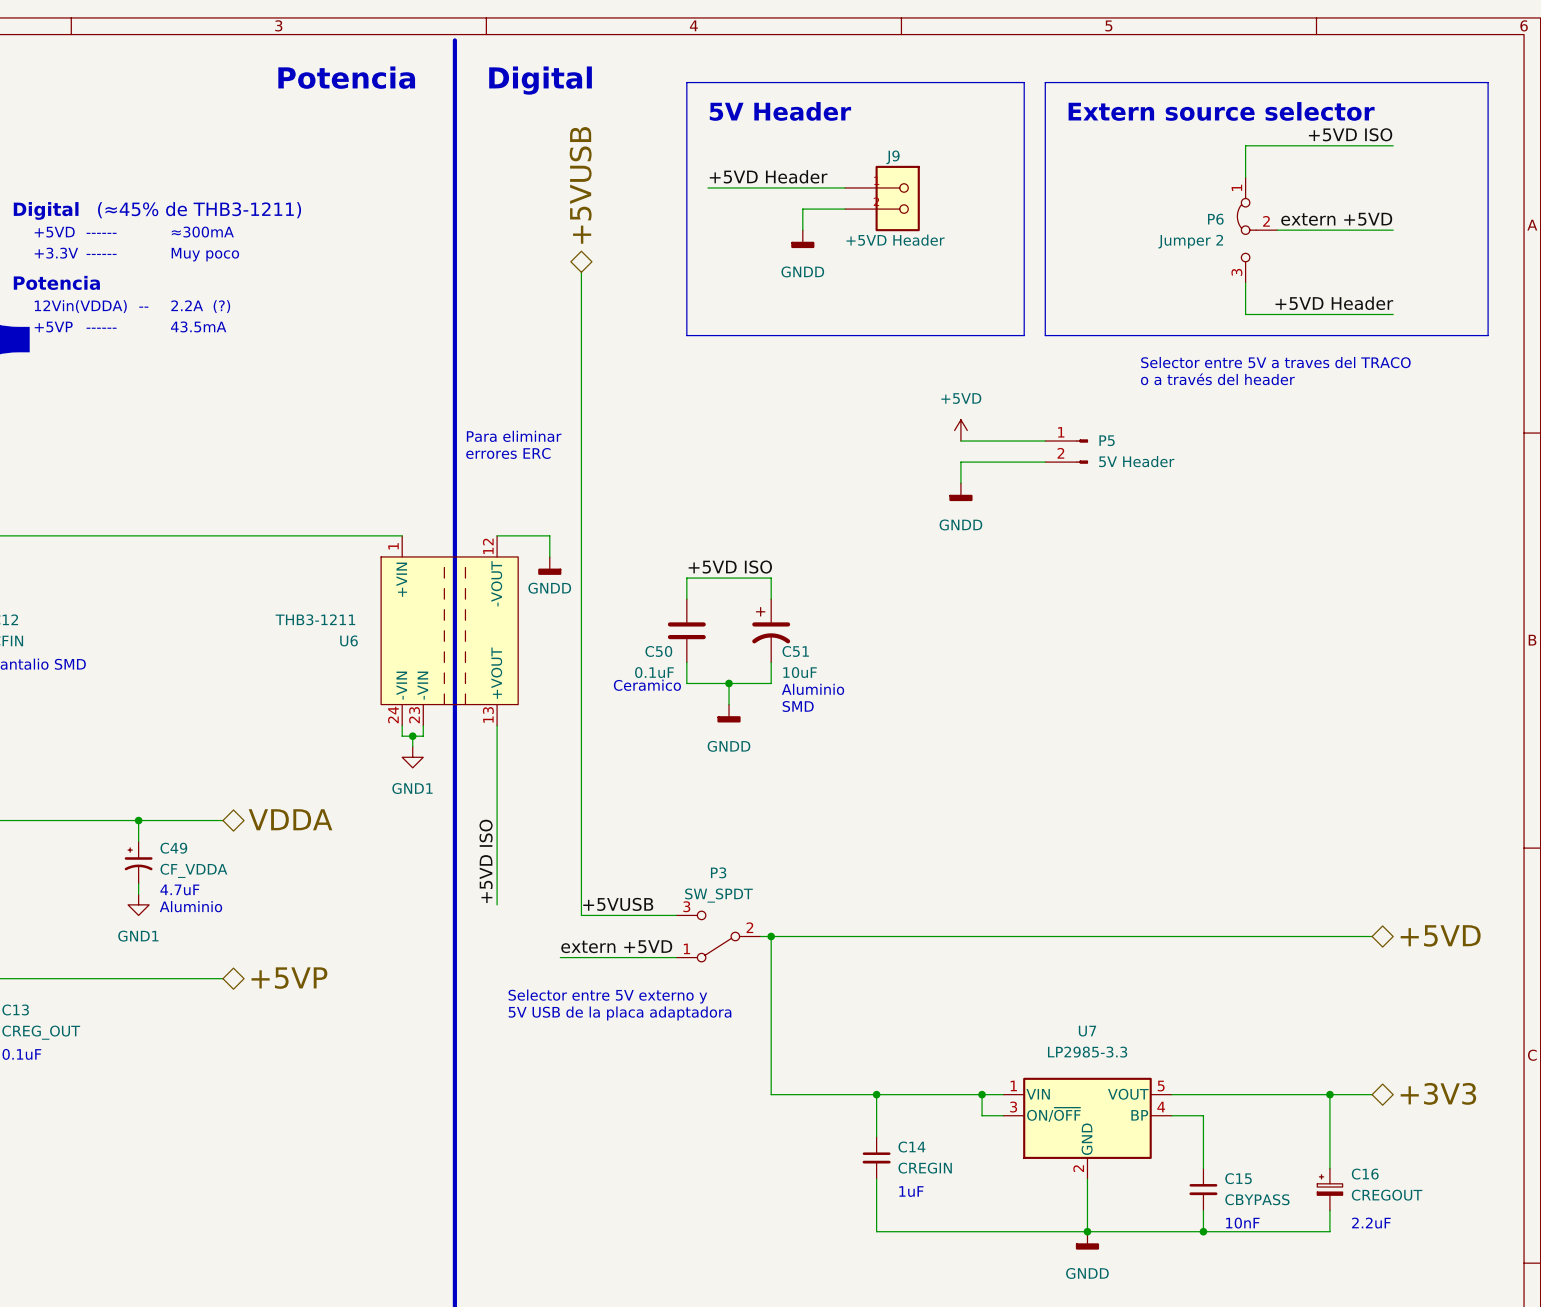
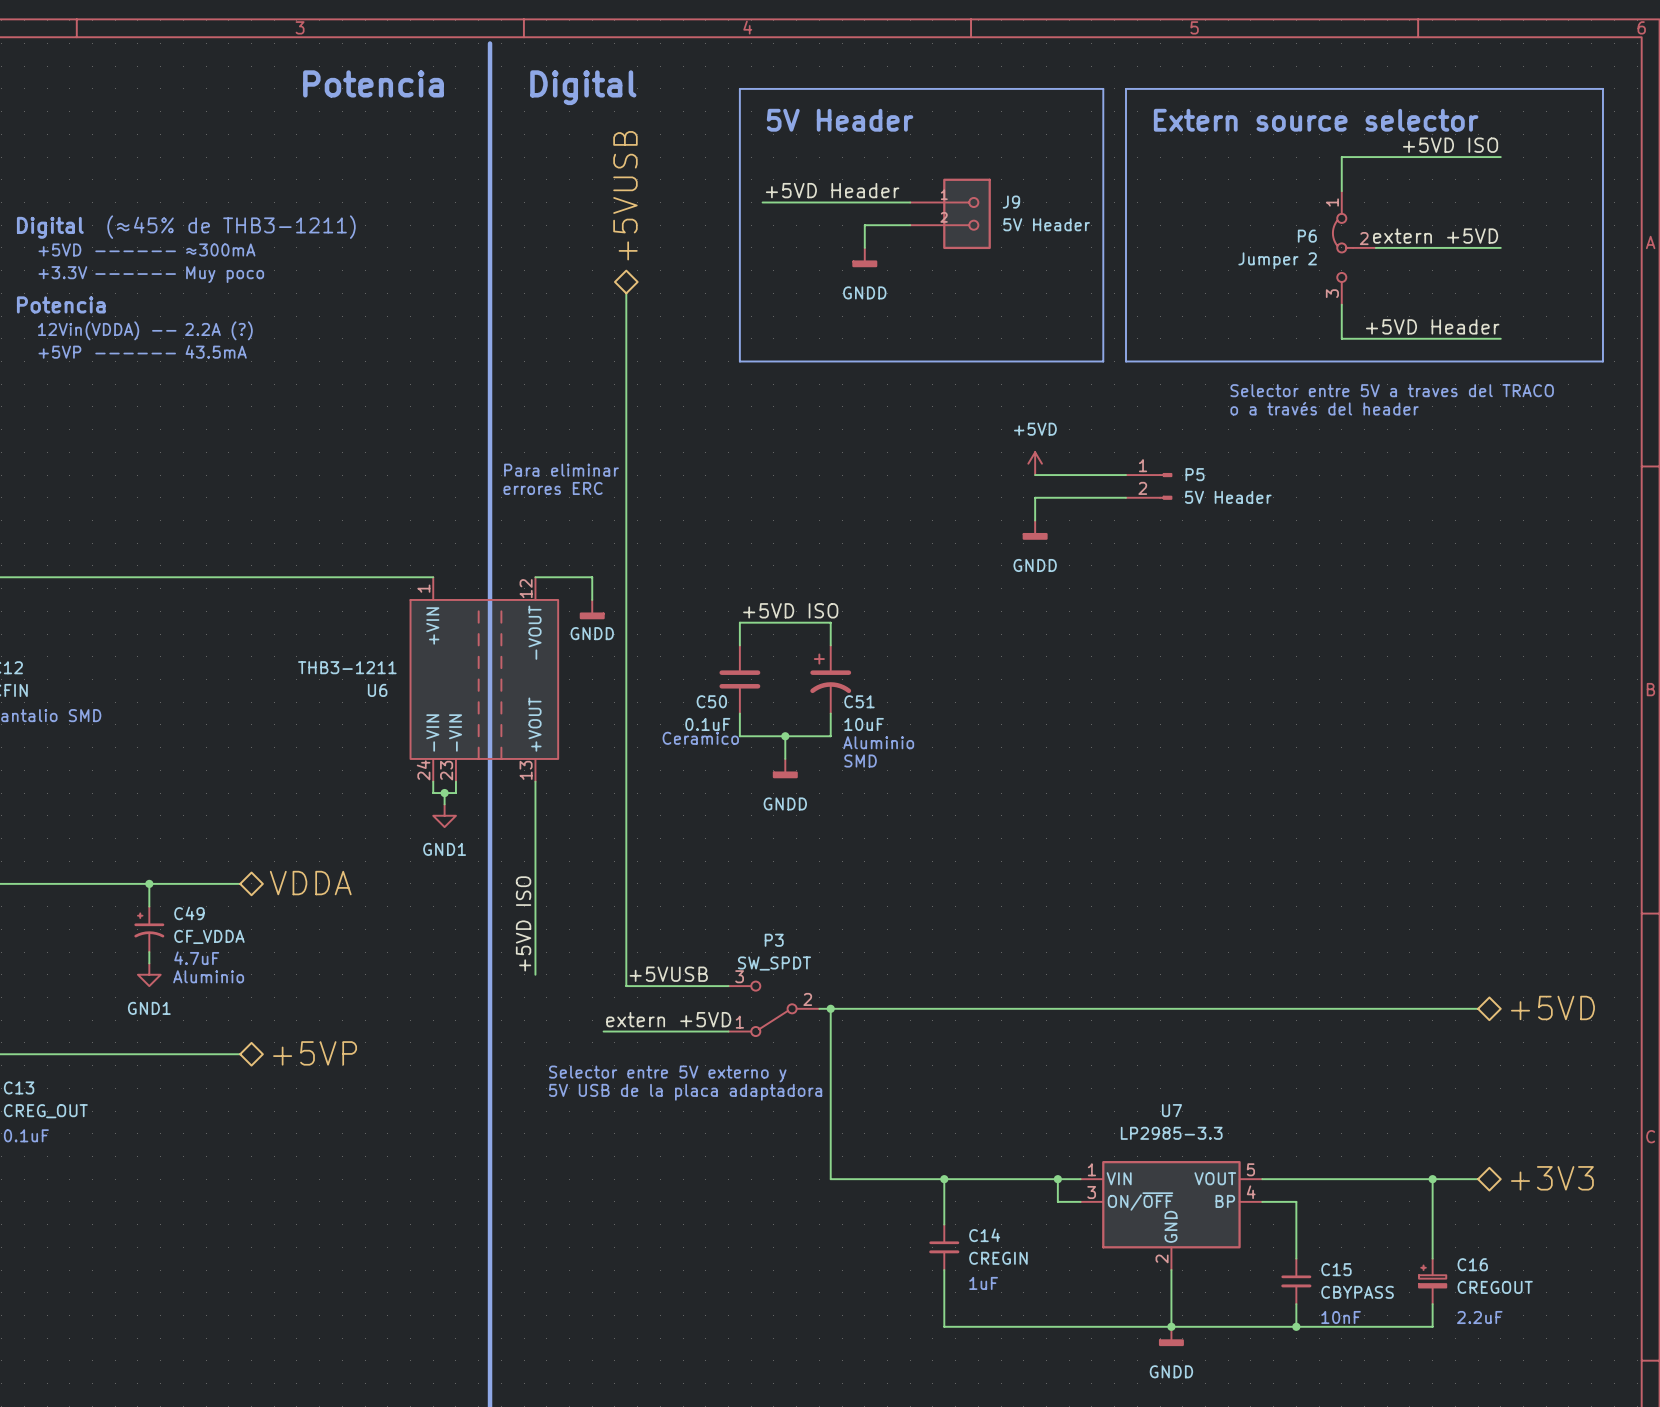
J9 name position: J9 (893, 157) -> J9 (1011, 202)
J9 value: +5VD Header (895, 240) -> 5V Header (1046, 224)

